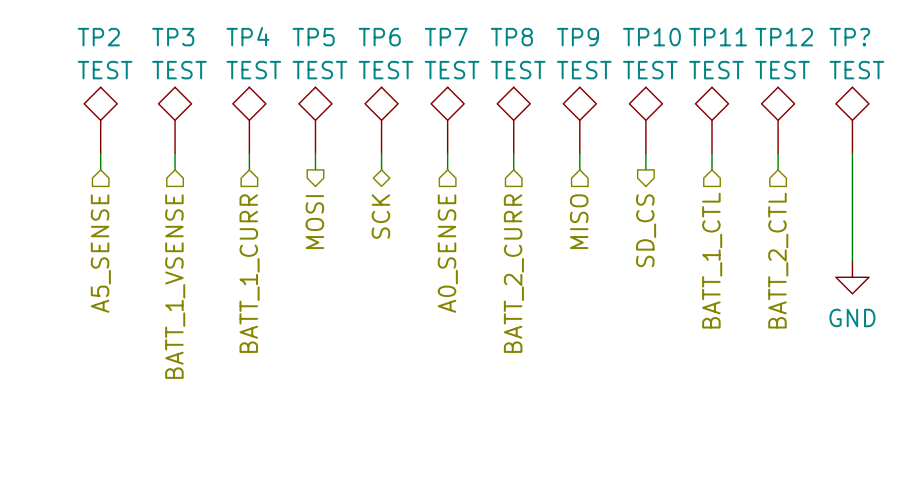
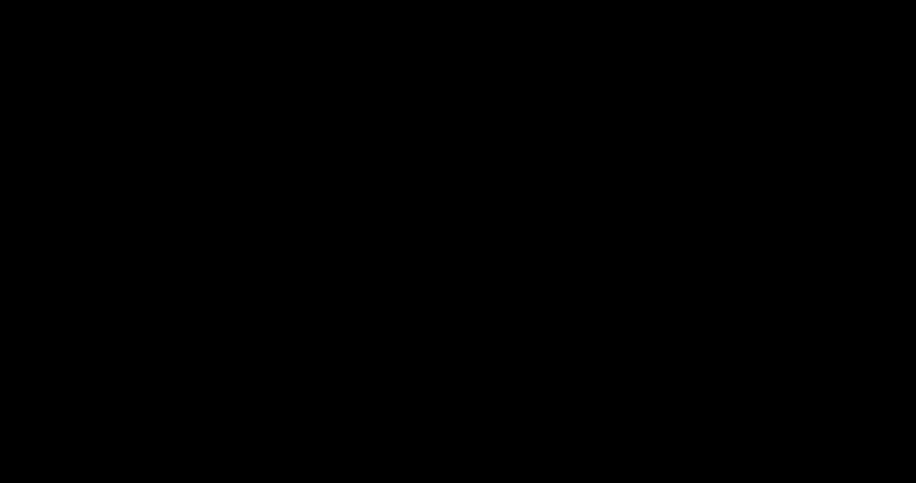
TP2: TEST (100, 120) -> none
TP3: TEST (175, 120) -> none
TP4: TEST (249, 120) -> none
TP5: TEST (315, 120) -> none
TP6: TEST (381, 120) -> none
TP7: TEST (447, 120) -> none
TP8: TEST (513, 120) -> none
TP9: TEST (579, 120) -> none
TP10: TEST (645, 120) -> none
TP11: TEST (712, 120) -> none
TP12: TEST (778, 120) -> none
TP?: TEST (852, 120) -> none
wire: (100, 153) (100, 169) -> none
wire: (175, 153) (175, 169) -> none
wire: (249, 153) (249, 169) -> none
wire: (315, 153) (315, 169) -> none
wire: (381, 153) (381, 169) -> none
wire: (447, 153) (447, 169) -> none
wire: (513, 153) (513, 169) -> none
wire: (579, 153) (579, 169) -> none
wire: (645, 153) (645, 169) -> none
wire: (712, 153) (712, 169) -> none
wire: (778, 153) (778, 169) -> none
wire: (852, 153) (852, 260) -> none
hierarchical label: SCK (380, 216) -> none
hierarchical label: MISO (579, 221) -> none
hierarchical label: MOSI (314, 222) -> none
hierarchical label: SD_CS (646, 230) -> none
hierarchical label: A5_SENSE (100, 253) -> none
hierarchical label: A0_SENSE (447, 253) -> none
hierarchical label: BATT_1_CTL (712, 260) -> none
hierarchical label: BATT_2_CTL (778, 260) -> none
hierarchical label: BATT_1_CURR (249, 273) -> none
hierarchical label: BATT_2_CURR (513, 273) -> none
power symbol: GND (852, 277) -> none
hierarchical label: BATT_1_VSENSE (175, 286) -> none

